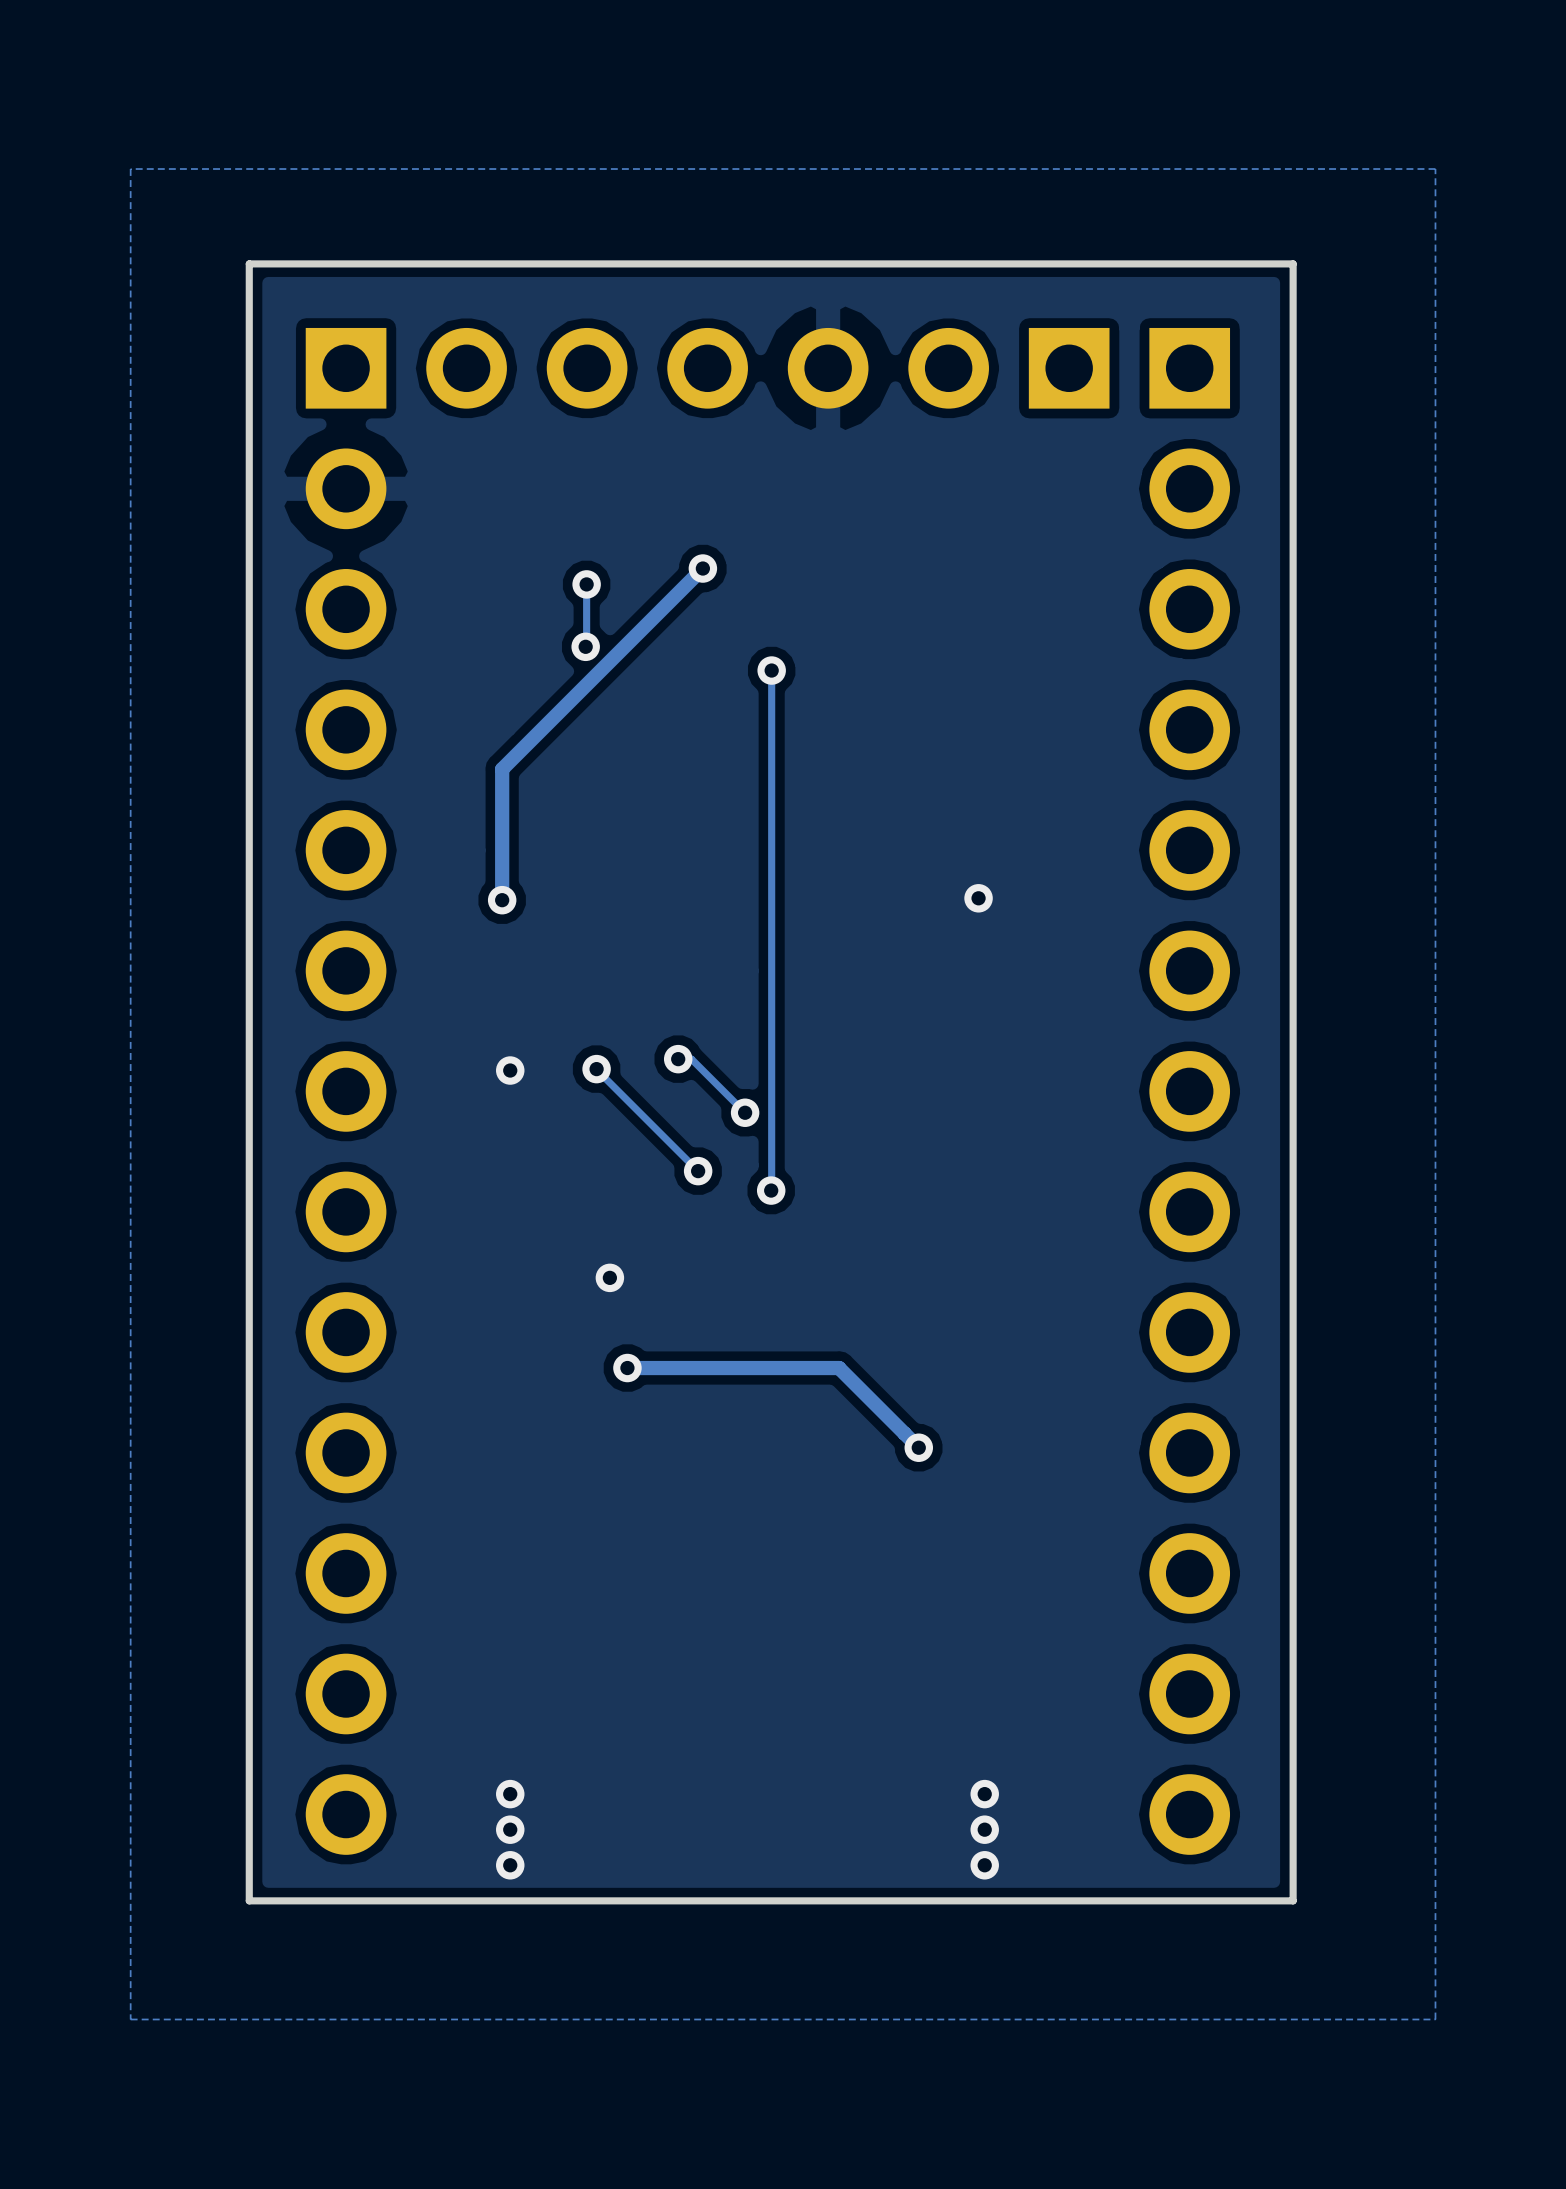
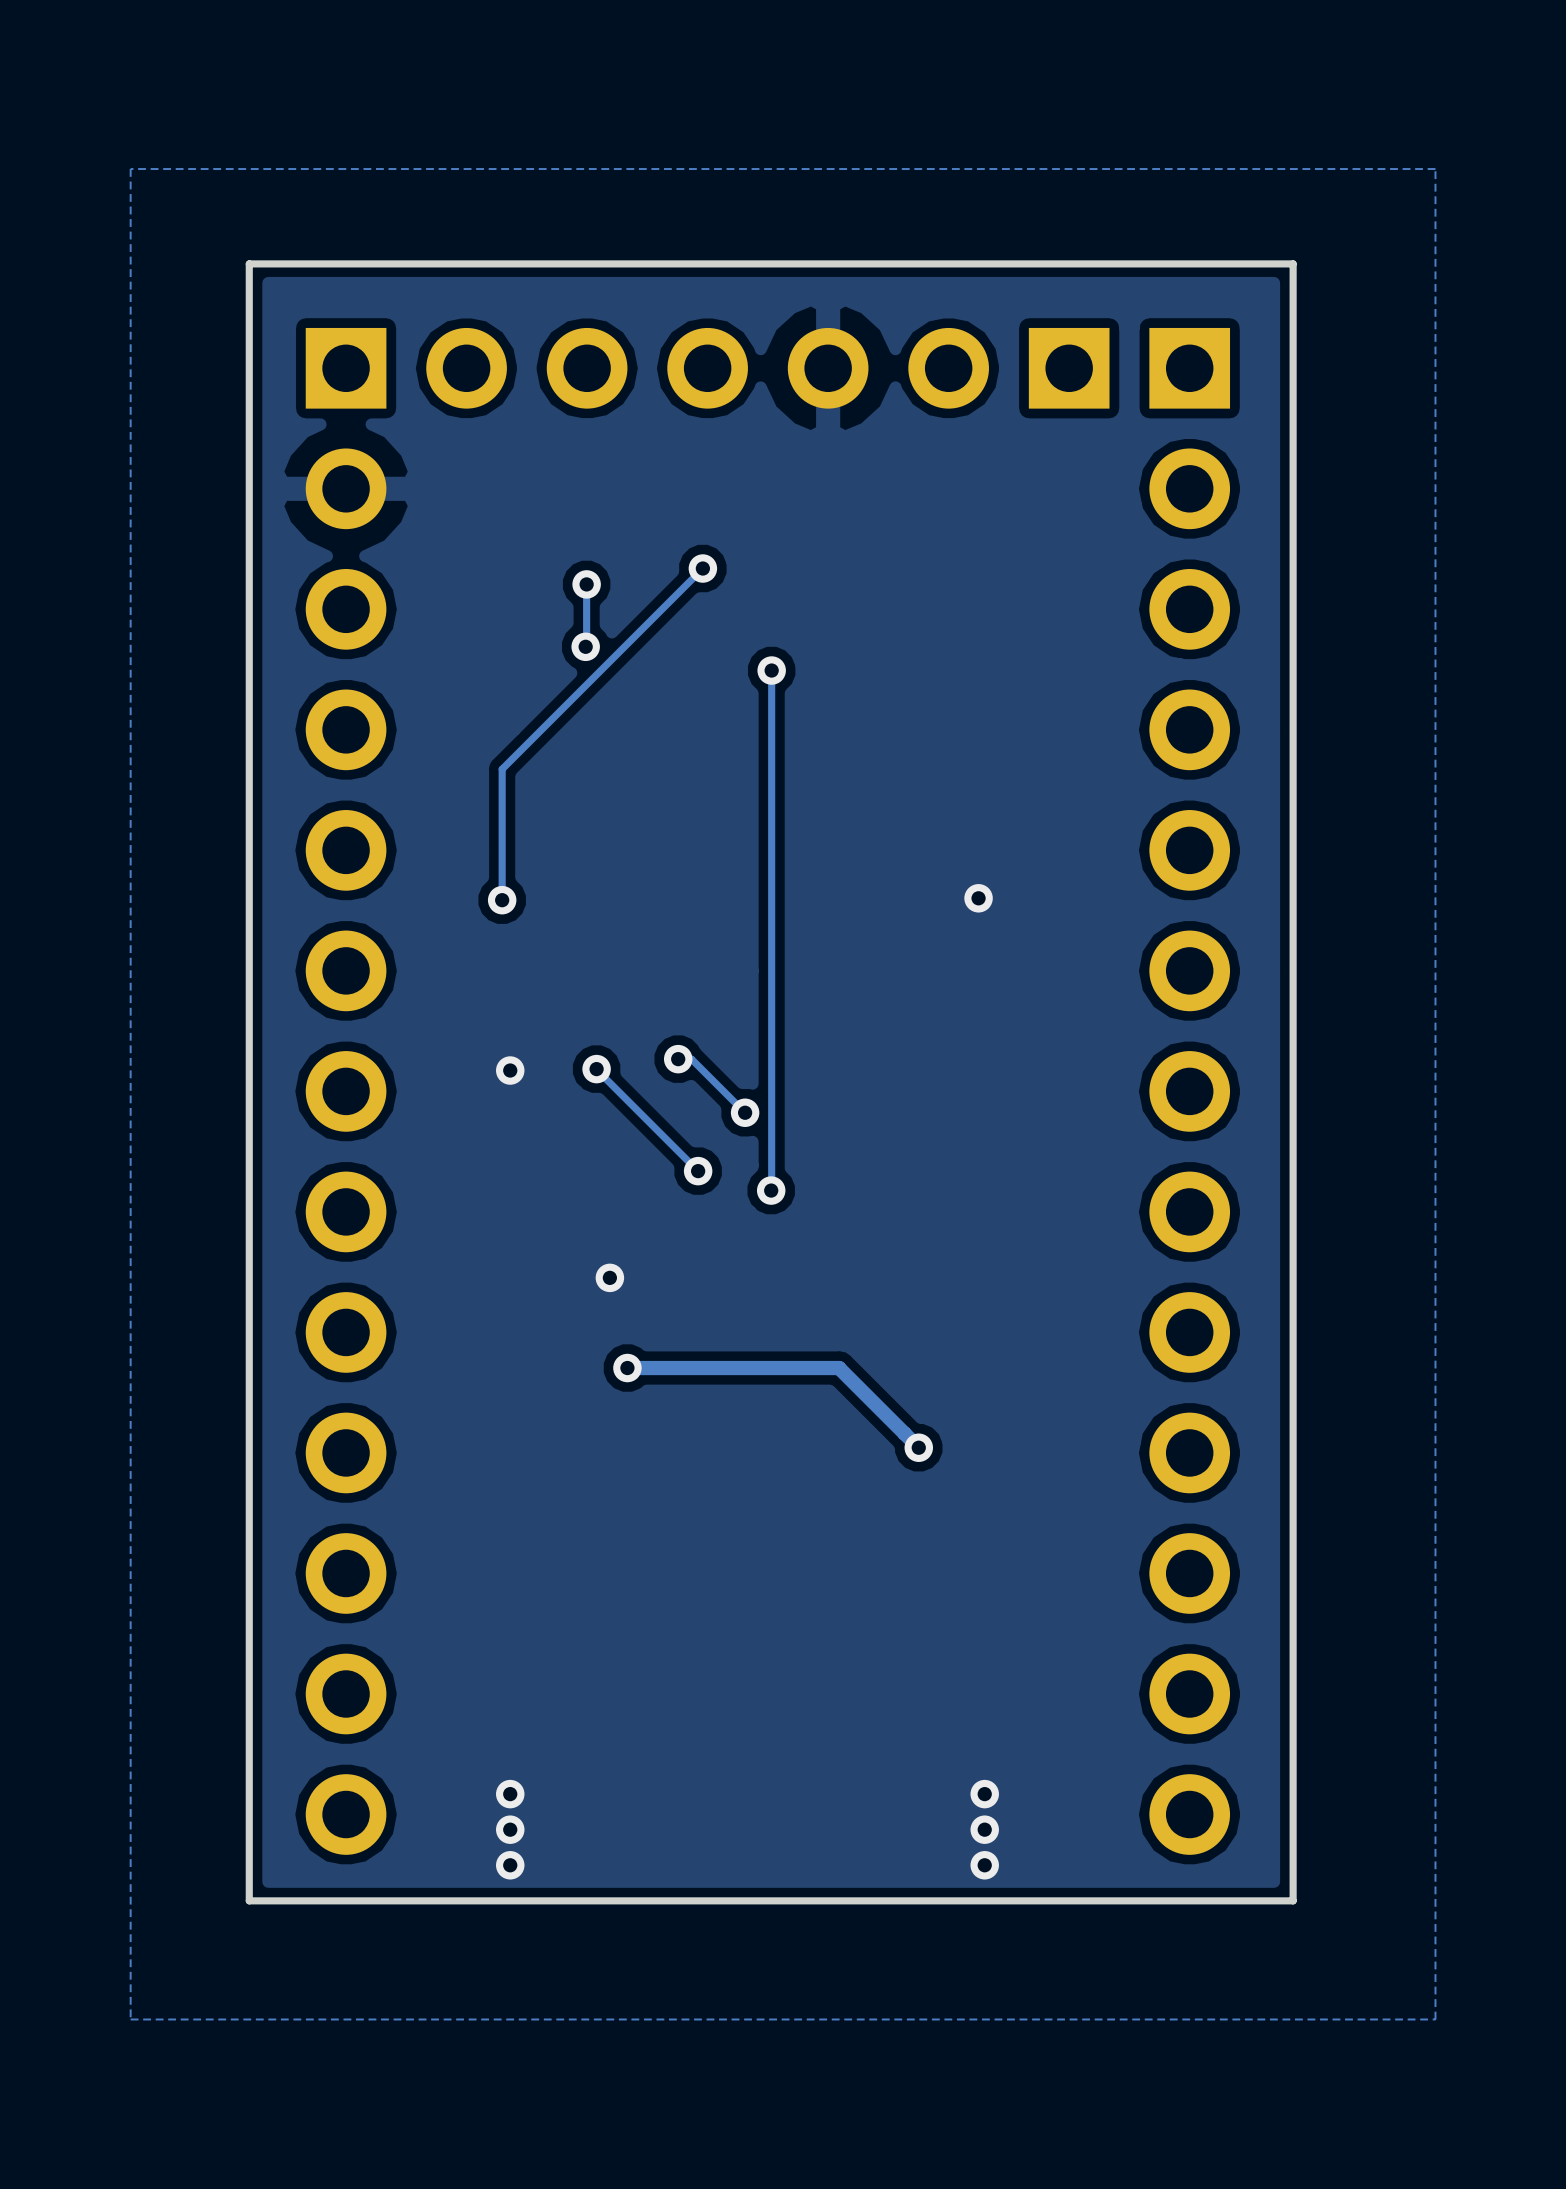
track width: thick (702, 568) (502, 769) (502, 900) -> thin (702, 568) (502, 769) (502, 900)

